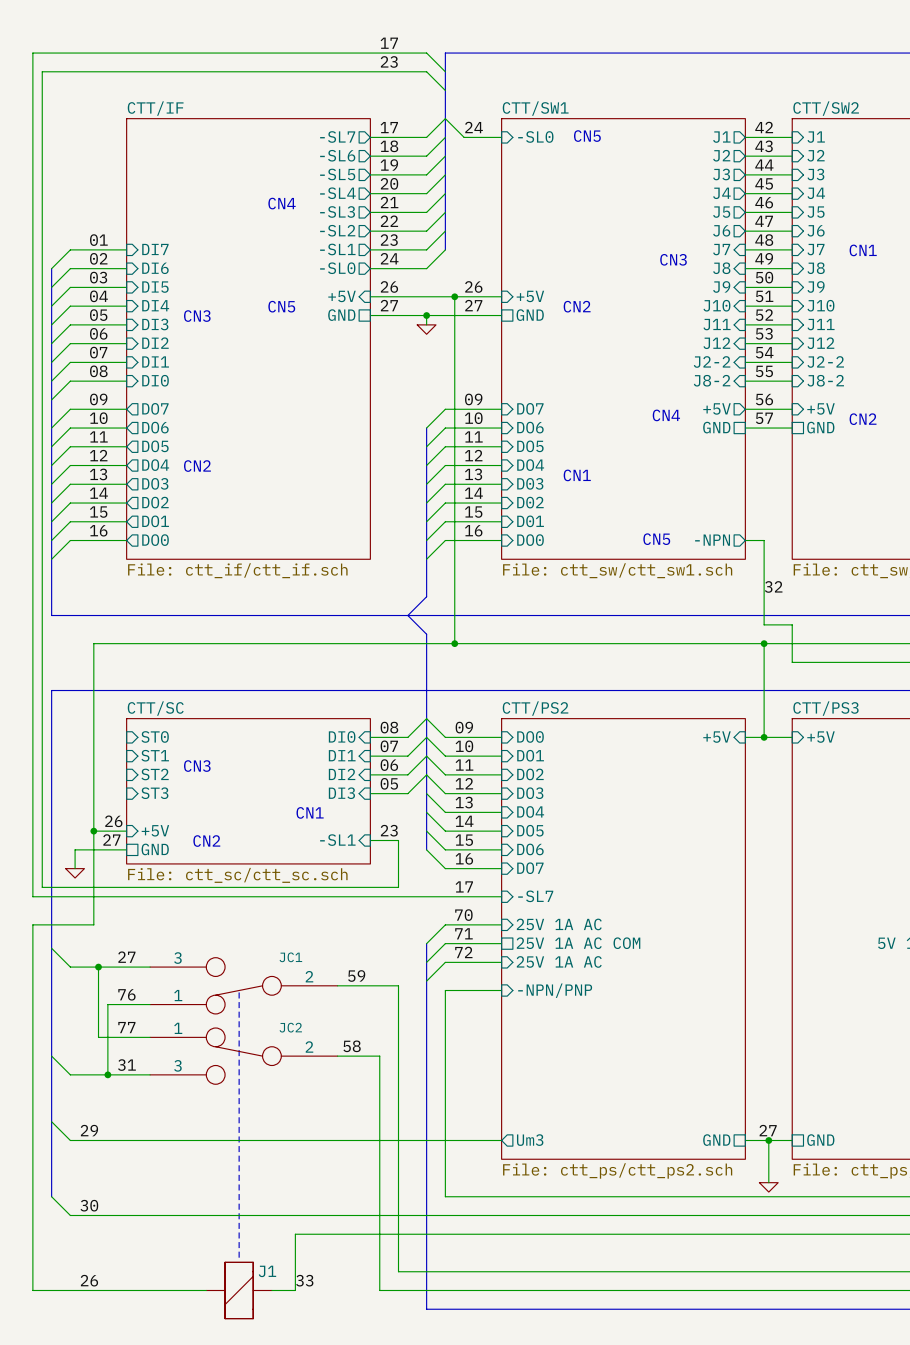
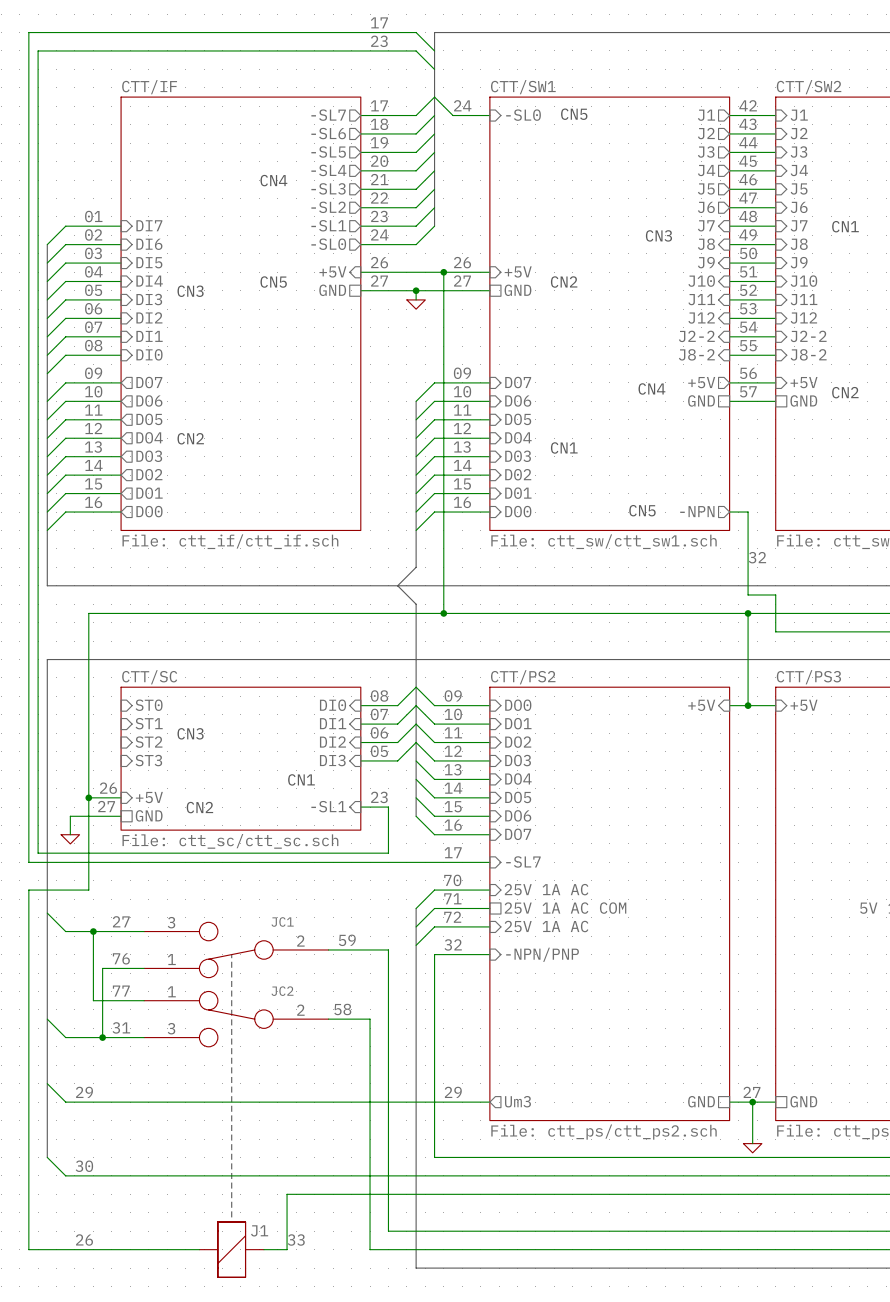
label: none -> 32 (453, 944)
label: none -> 29 (453, 1092)

